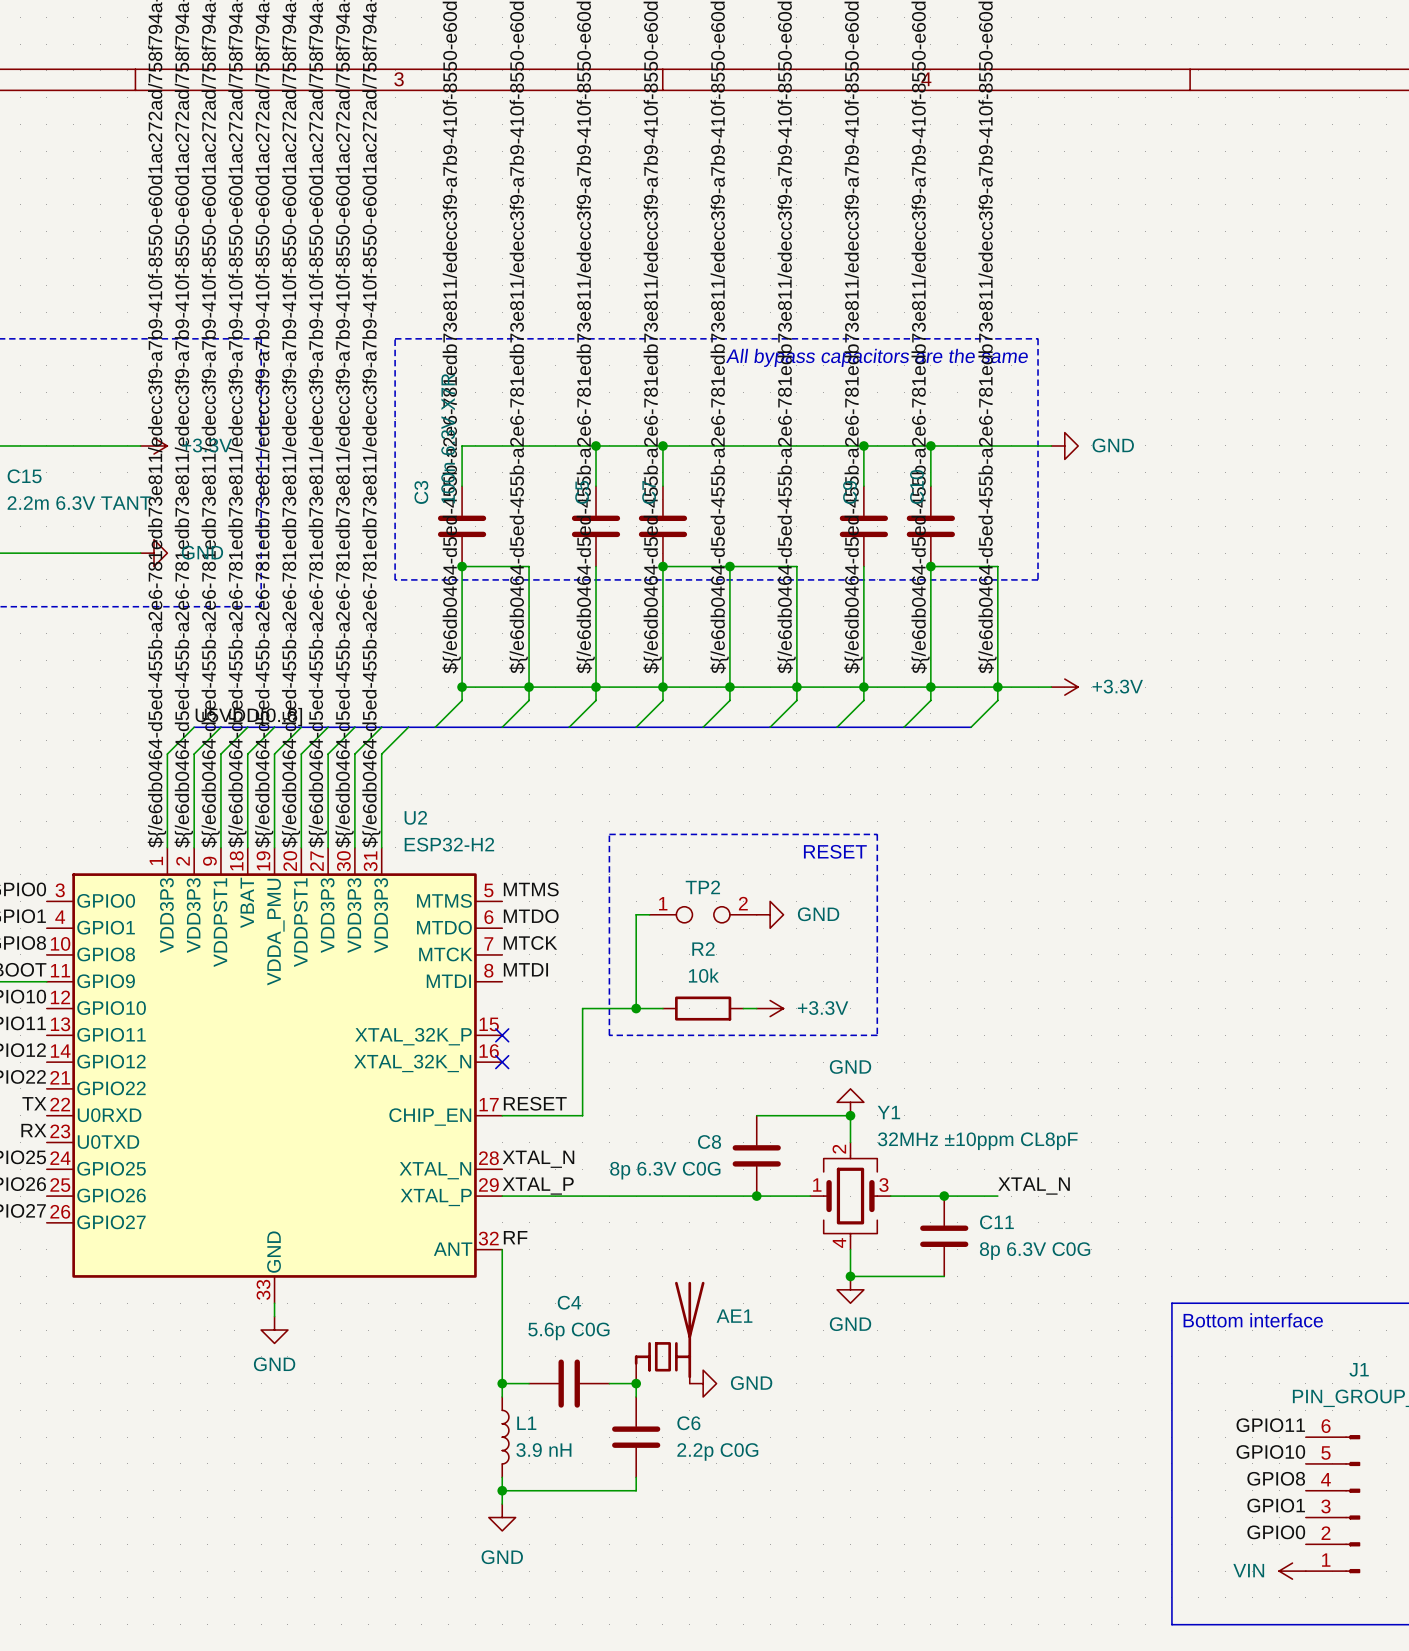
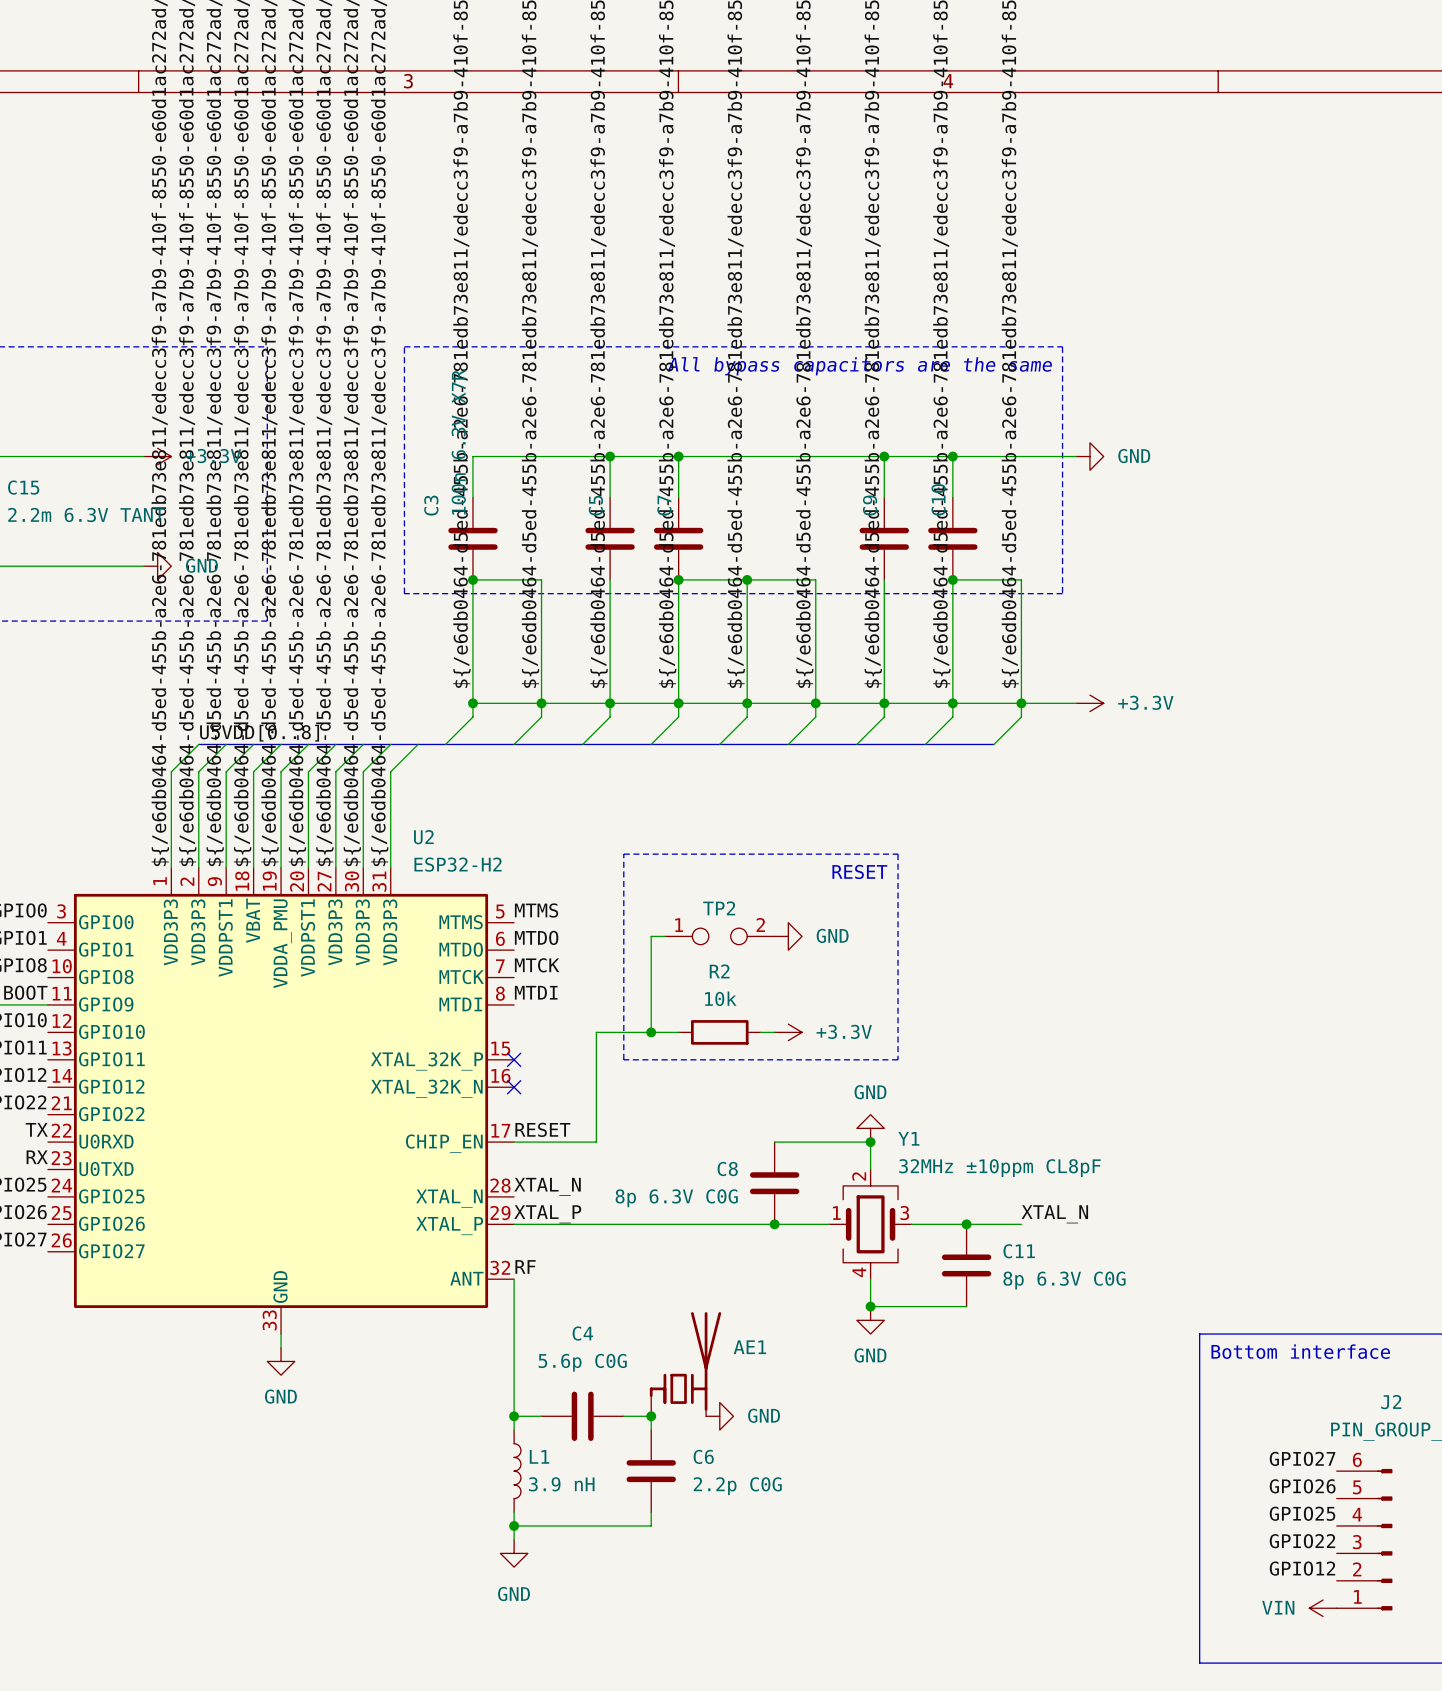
J1 name: J1 (1359, 1369) -> J2 (1391, 1402)
label: GPIO11 (1270, 1425) -> GPIO27 (1302, 1458)
label: GPIO10 (1270, 1452) -> GPIO26 (1302, 1486)
label: GPIO8 (1276, 1478) -> GPIO25 (1302, 1513)
label: GPIO1 (1276, 1505) -> GPIO22 (1302, 1541)
label: GPIO0 (1276, 1532) -> GPIO12 (1302, 1568)

